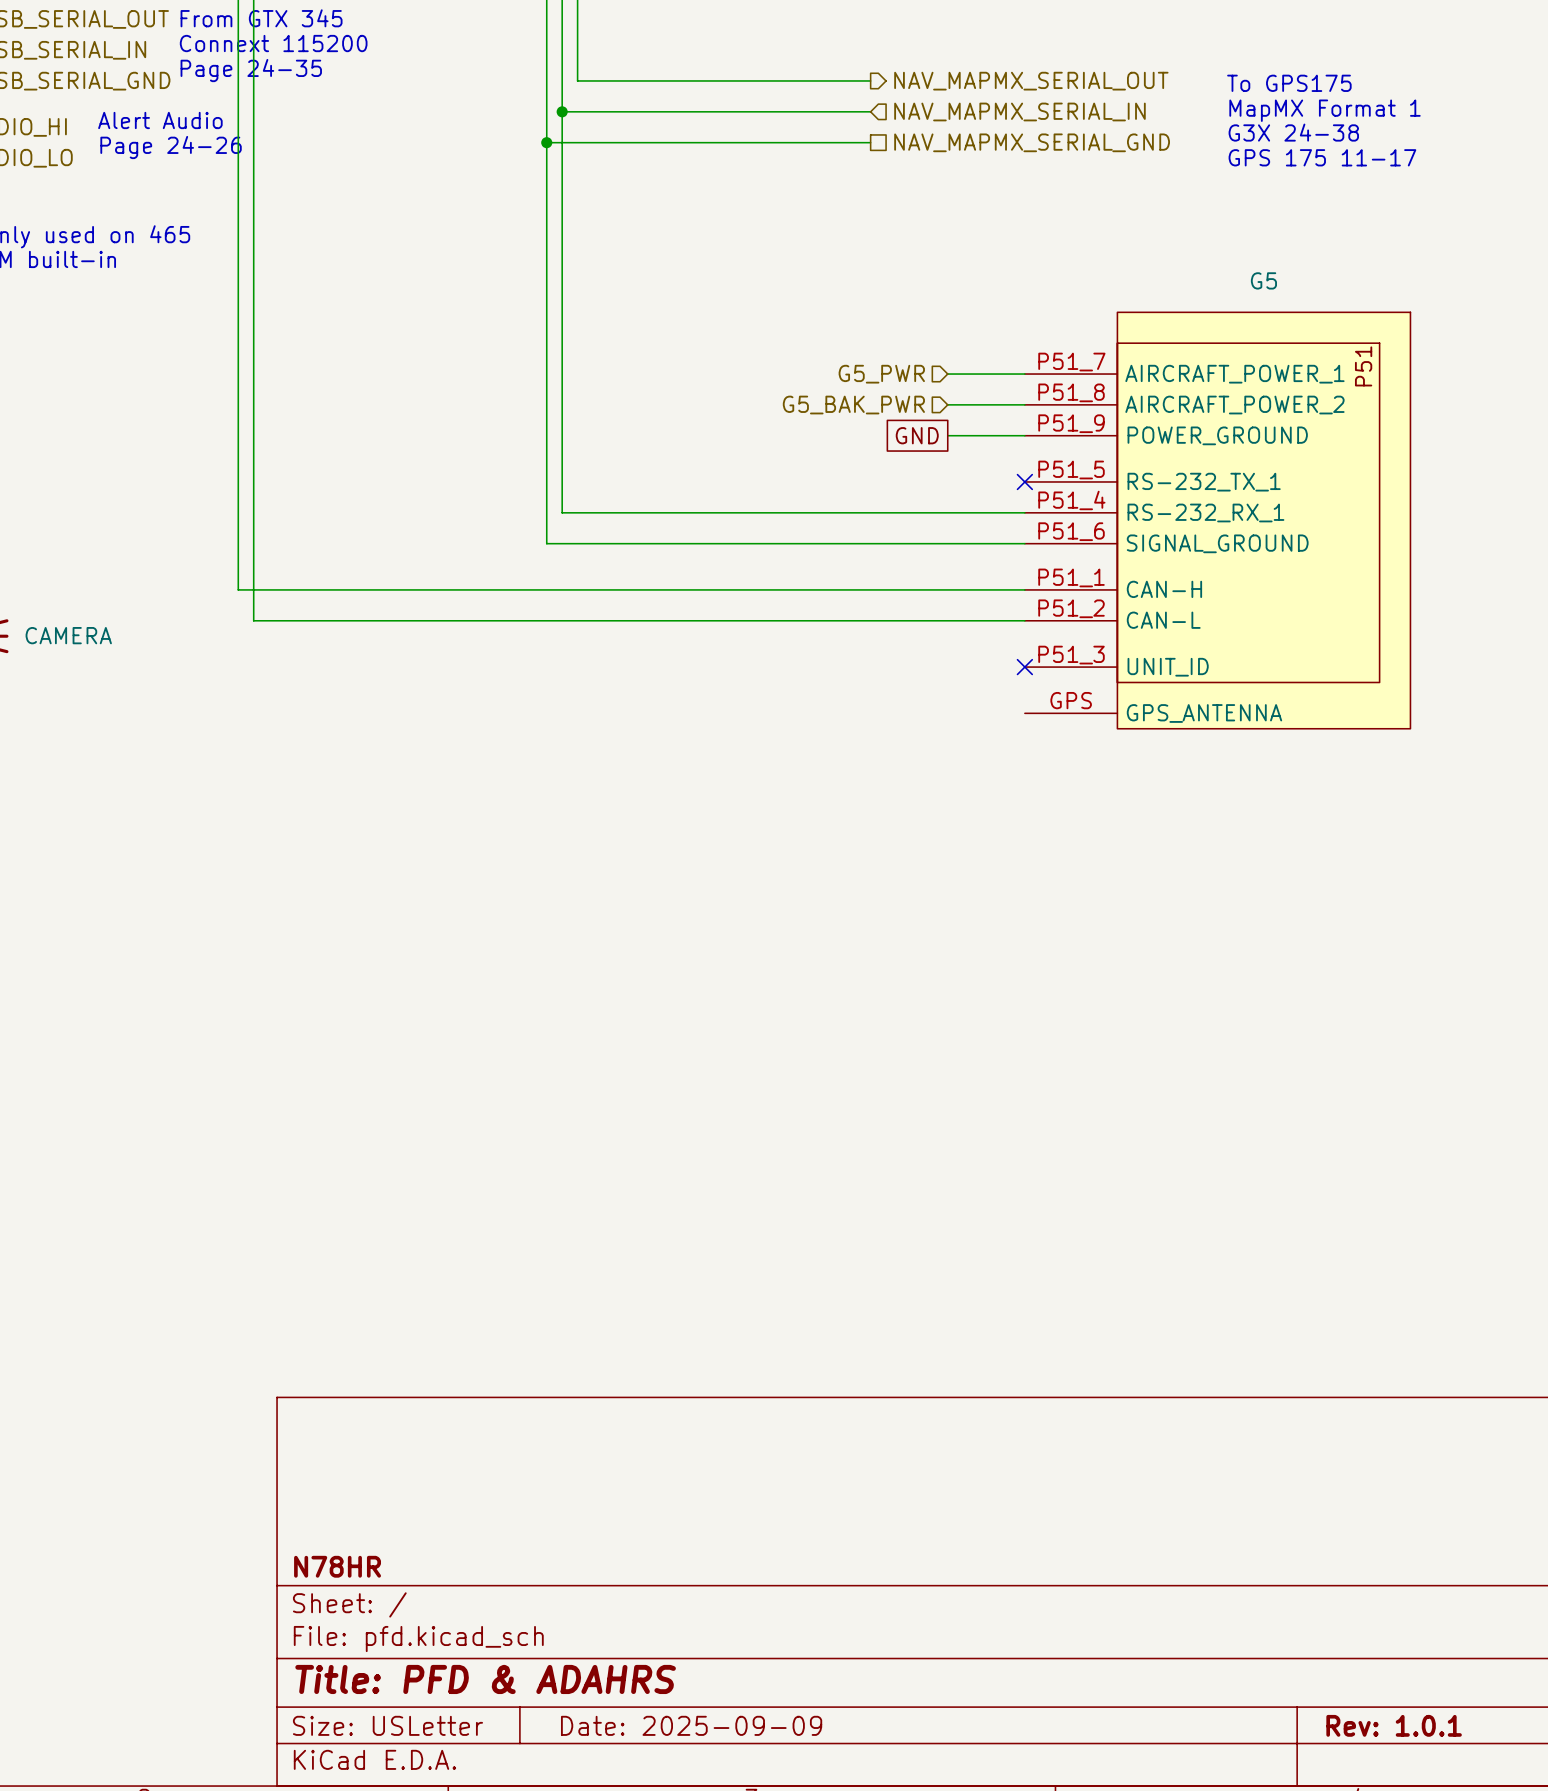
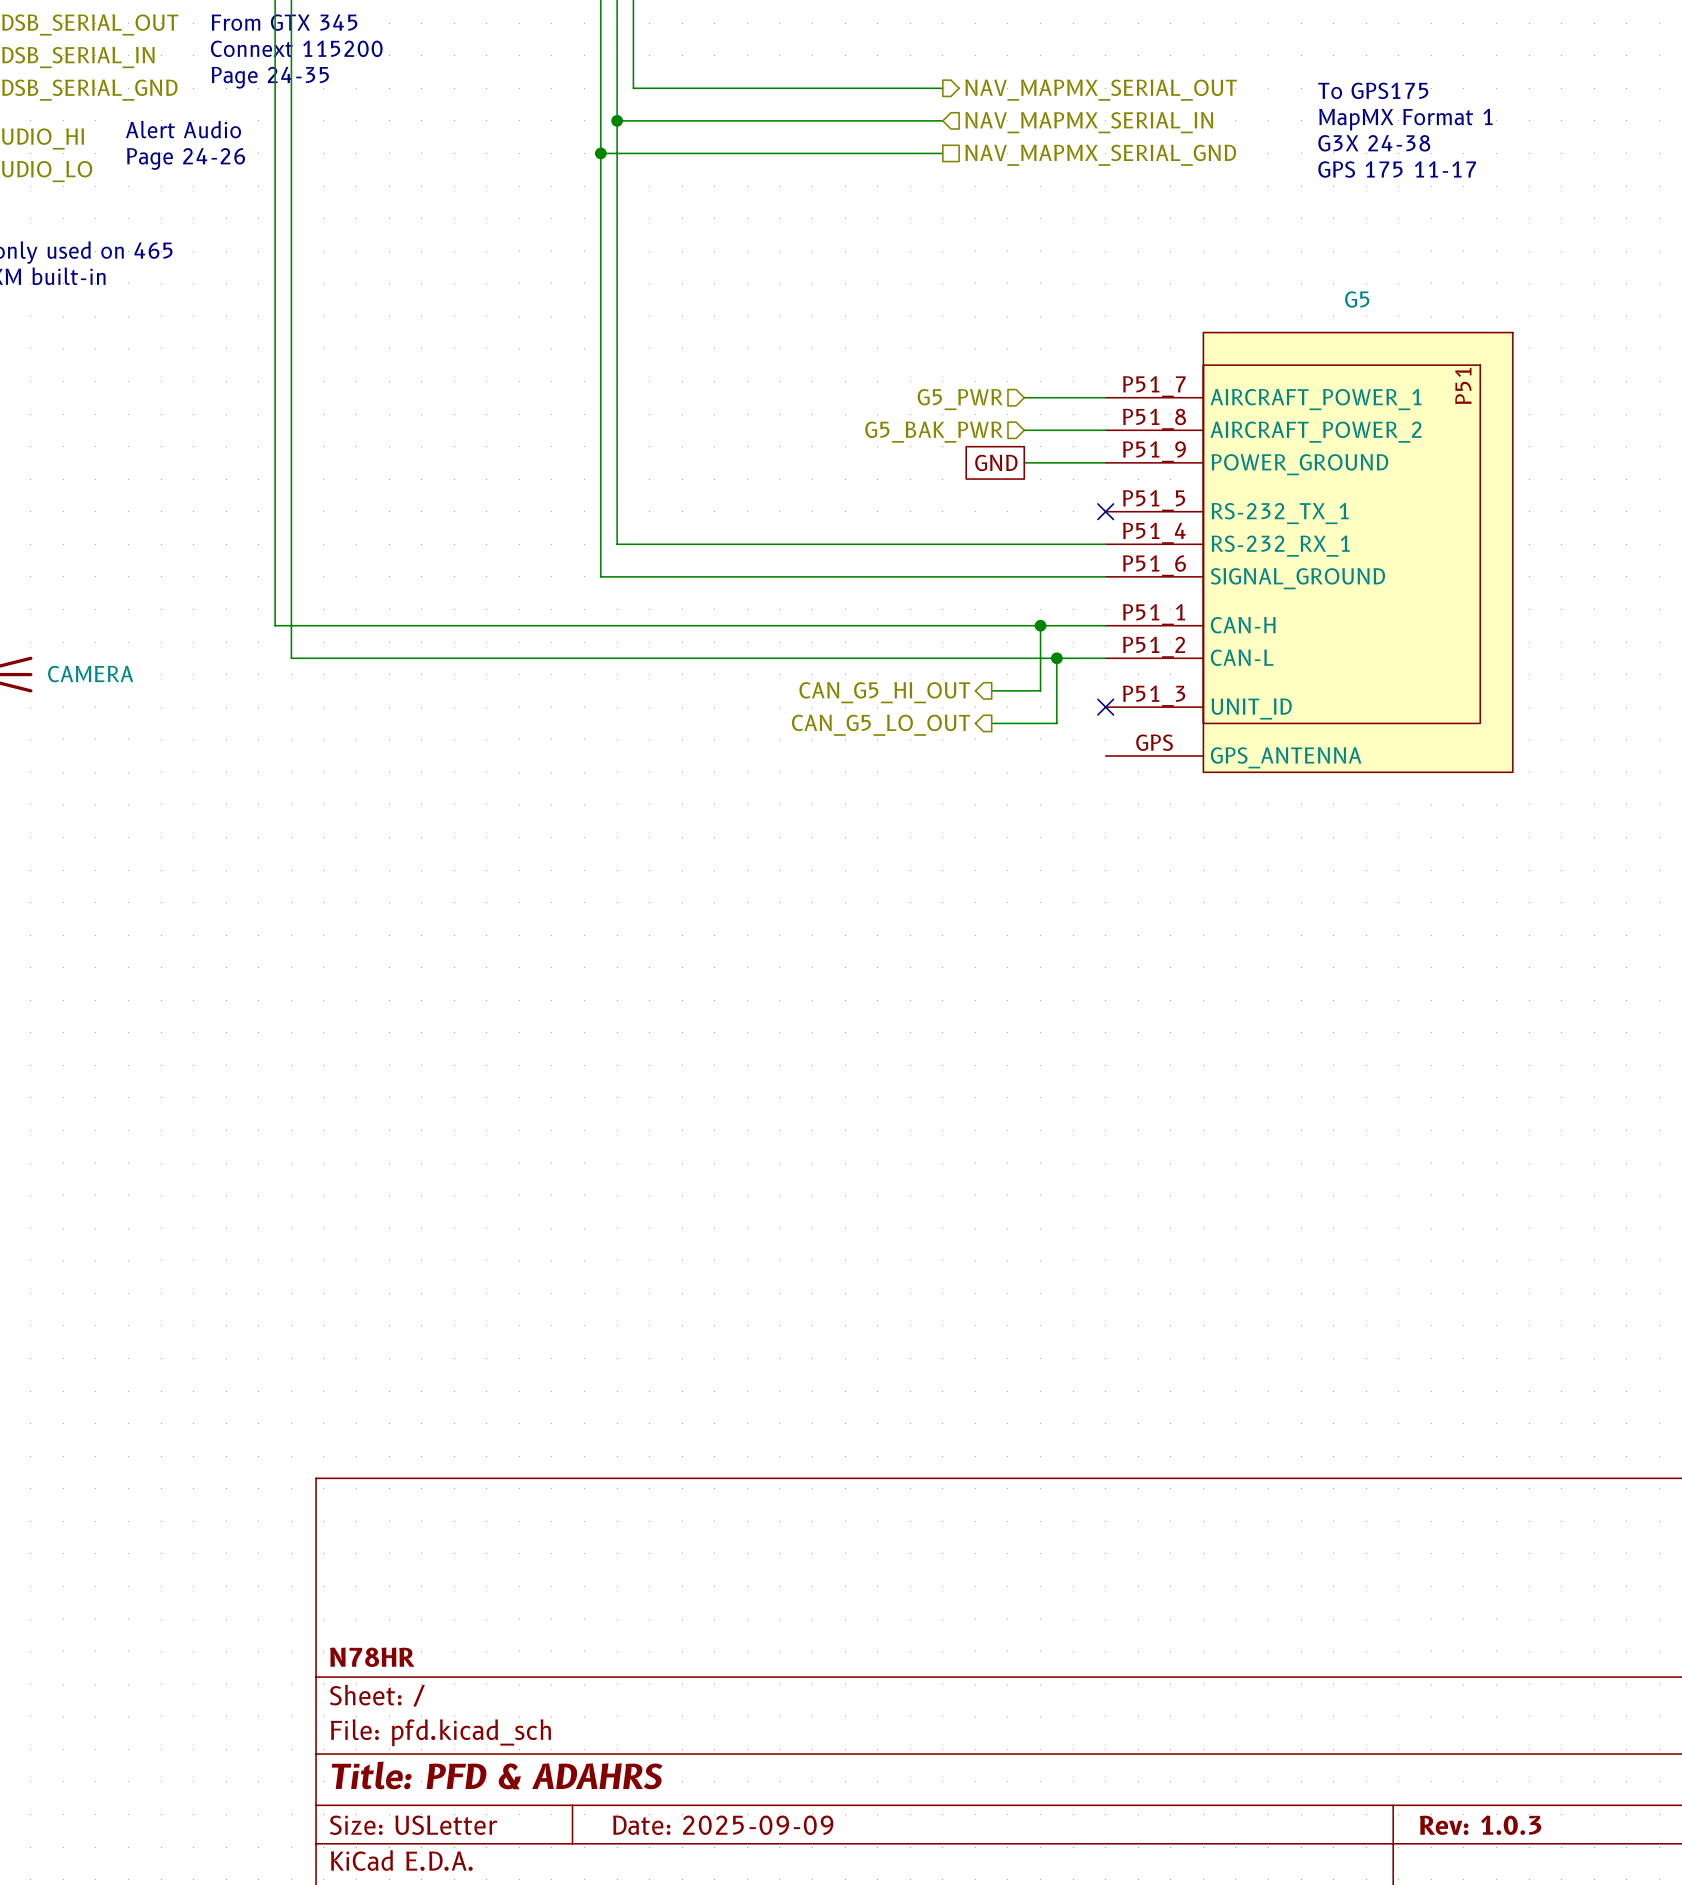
wire: none -> (1040, 625) (1040, 690) (991, 690)
junction: none -> (1040, 625)
wire: none -> (1056, 658) (1056, 723) (991, 723)
junction: none -> (1056, 658)
hierarchical label: none -> CAN_G5_HI_OUT (884, 692)
hierarchical label: none -> CAN_G5_LO_OUT (881, 725)
title block: Rev: 1.0.1 (1394, 1725) -> Rev: 1.0.3 (1480, 1825)

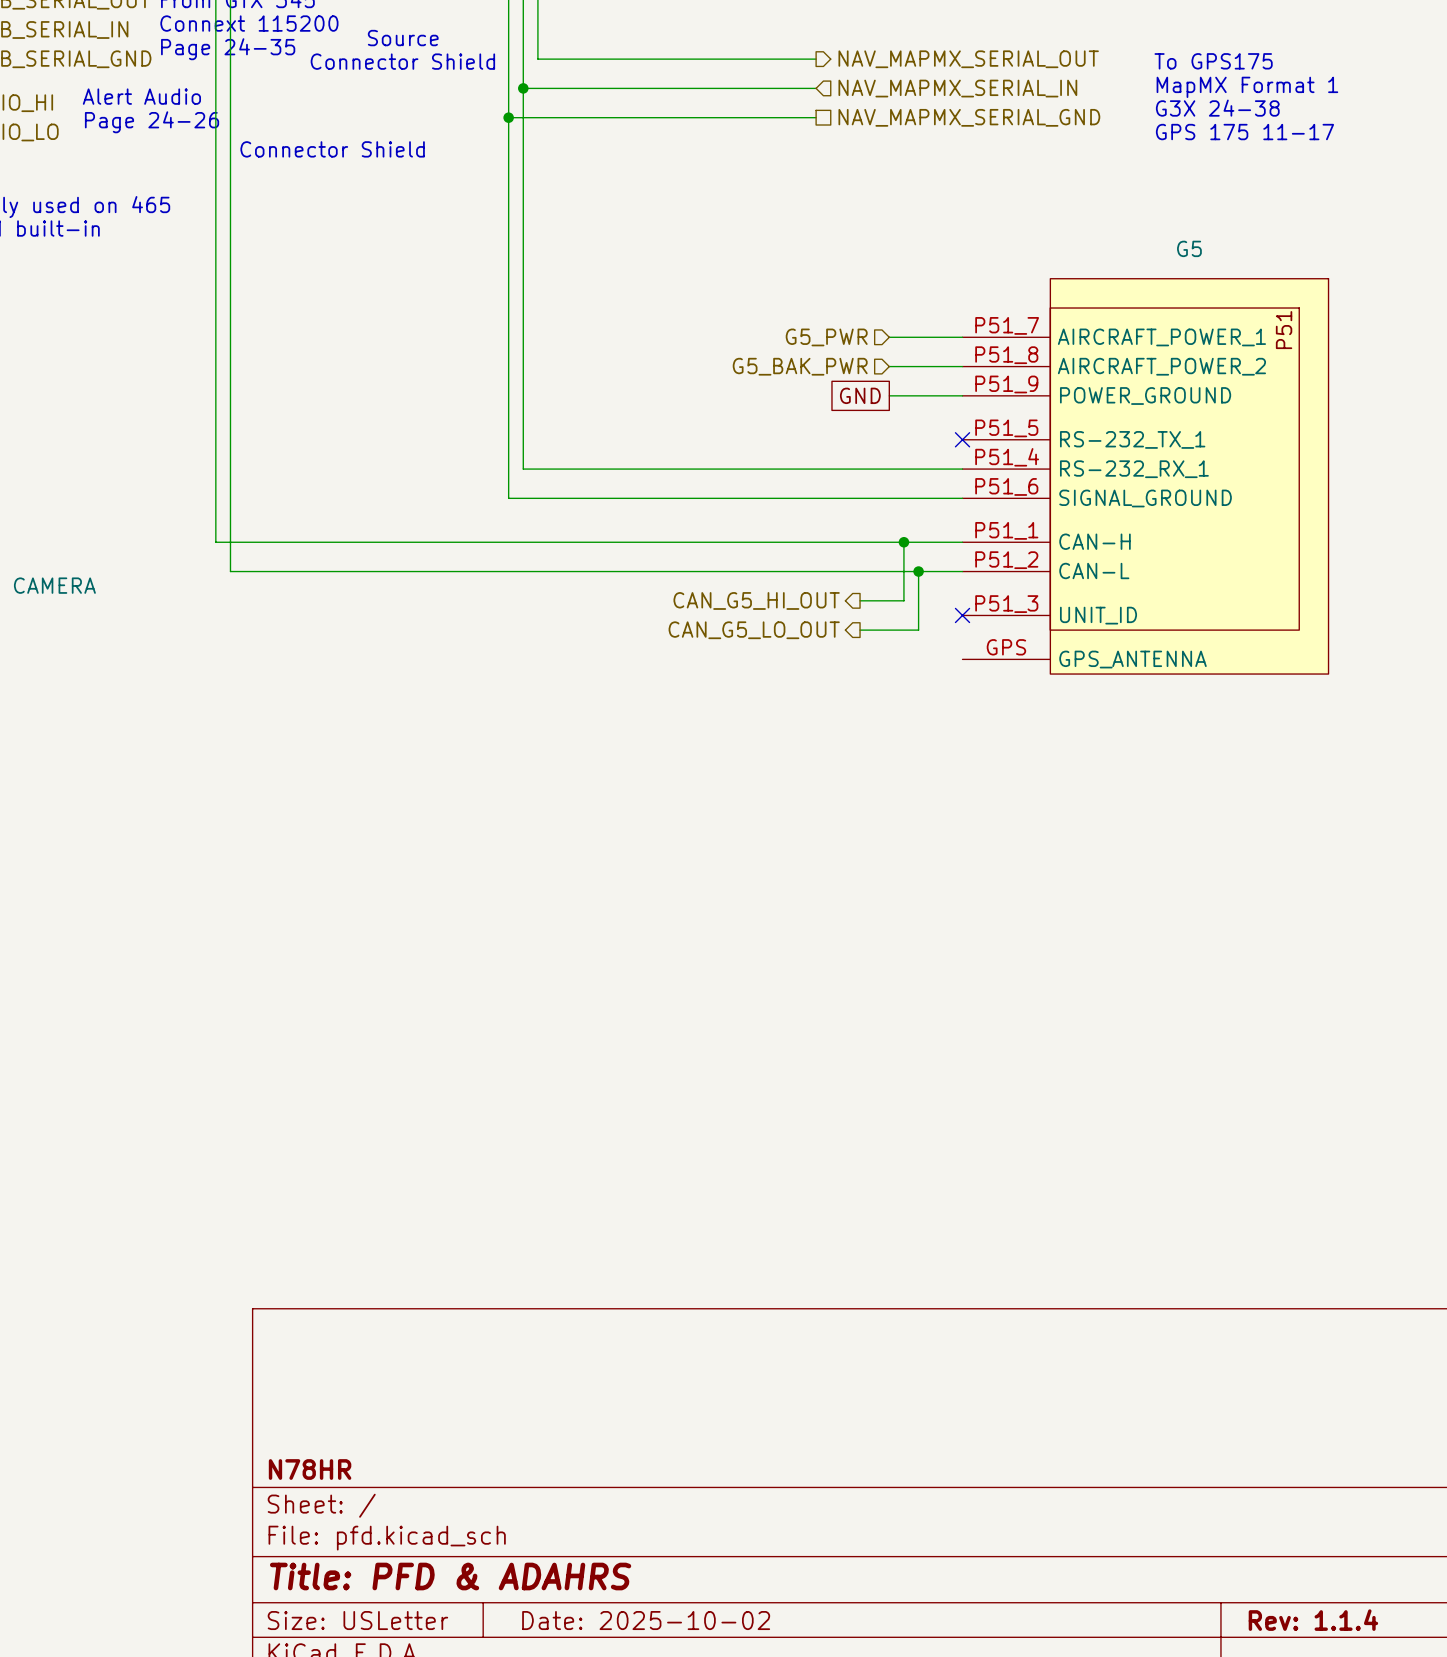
text: none -> Source (403, 38)
text: none -> Connector Shield (402, 61)
text: none -> Connector Shield (332, 149)
title block: Date: 2025-09-09 (723, 1825) -> Date: 2025-10-02 (646, 1620)
title block: Rev: 1.0.3 (1480, 1825) -> Rev: 1.1.4 (1313, 1620)

